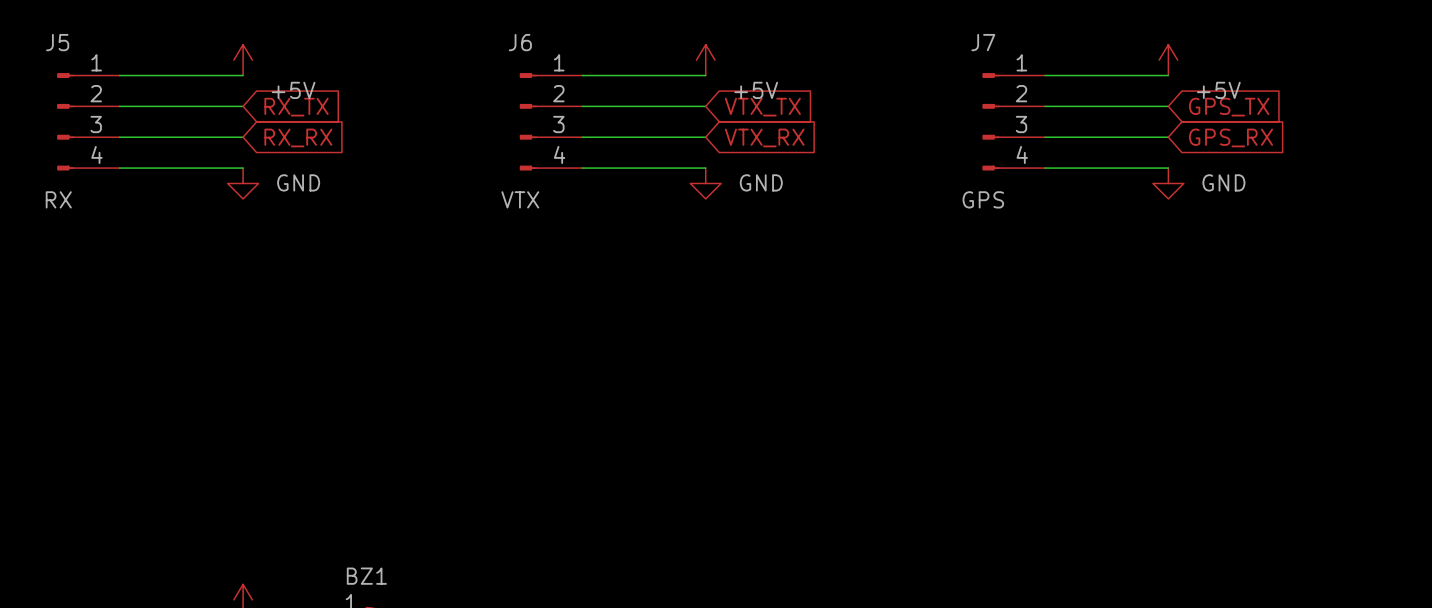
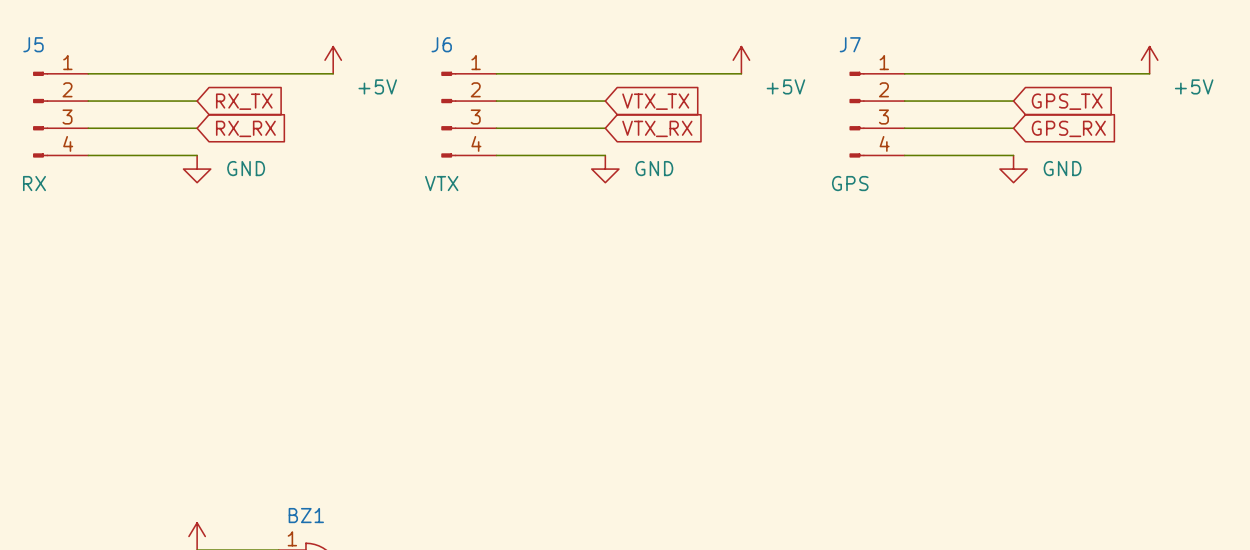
power symbol: +5V (243, 60) -> none
power symbol: none -> +5V (333, 60)
power symbol: +5V (705, 60) -> none
power symbol: none -> +5V (741, 60)
power symbol: +5V (1168, 60) -> none
power symbol: none -> +5V (1149, 60)
wire: none -> (197, 73) (333, 73)
wire: none -> (605, 73) (741, 73)
wire: none -> (1013, 73) (1149, 73)

